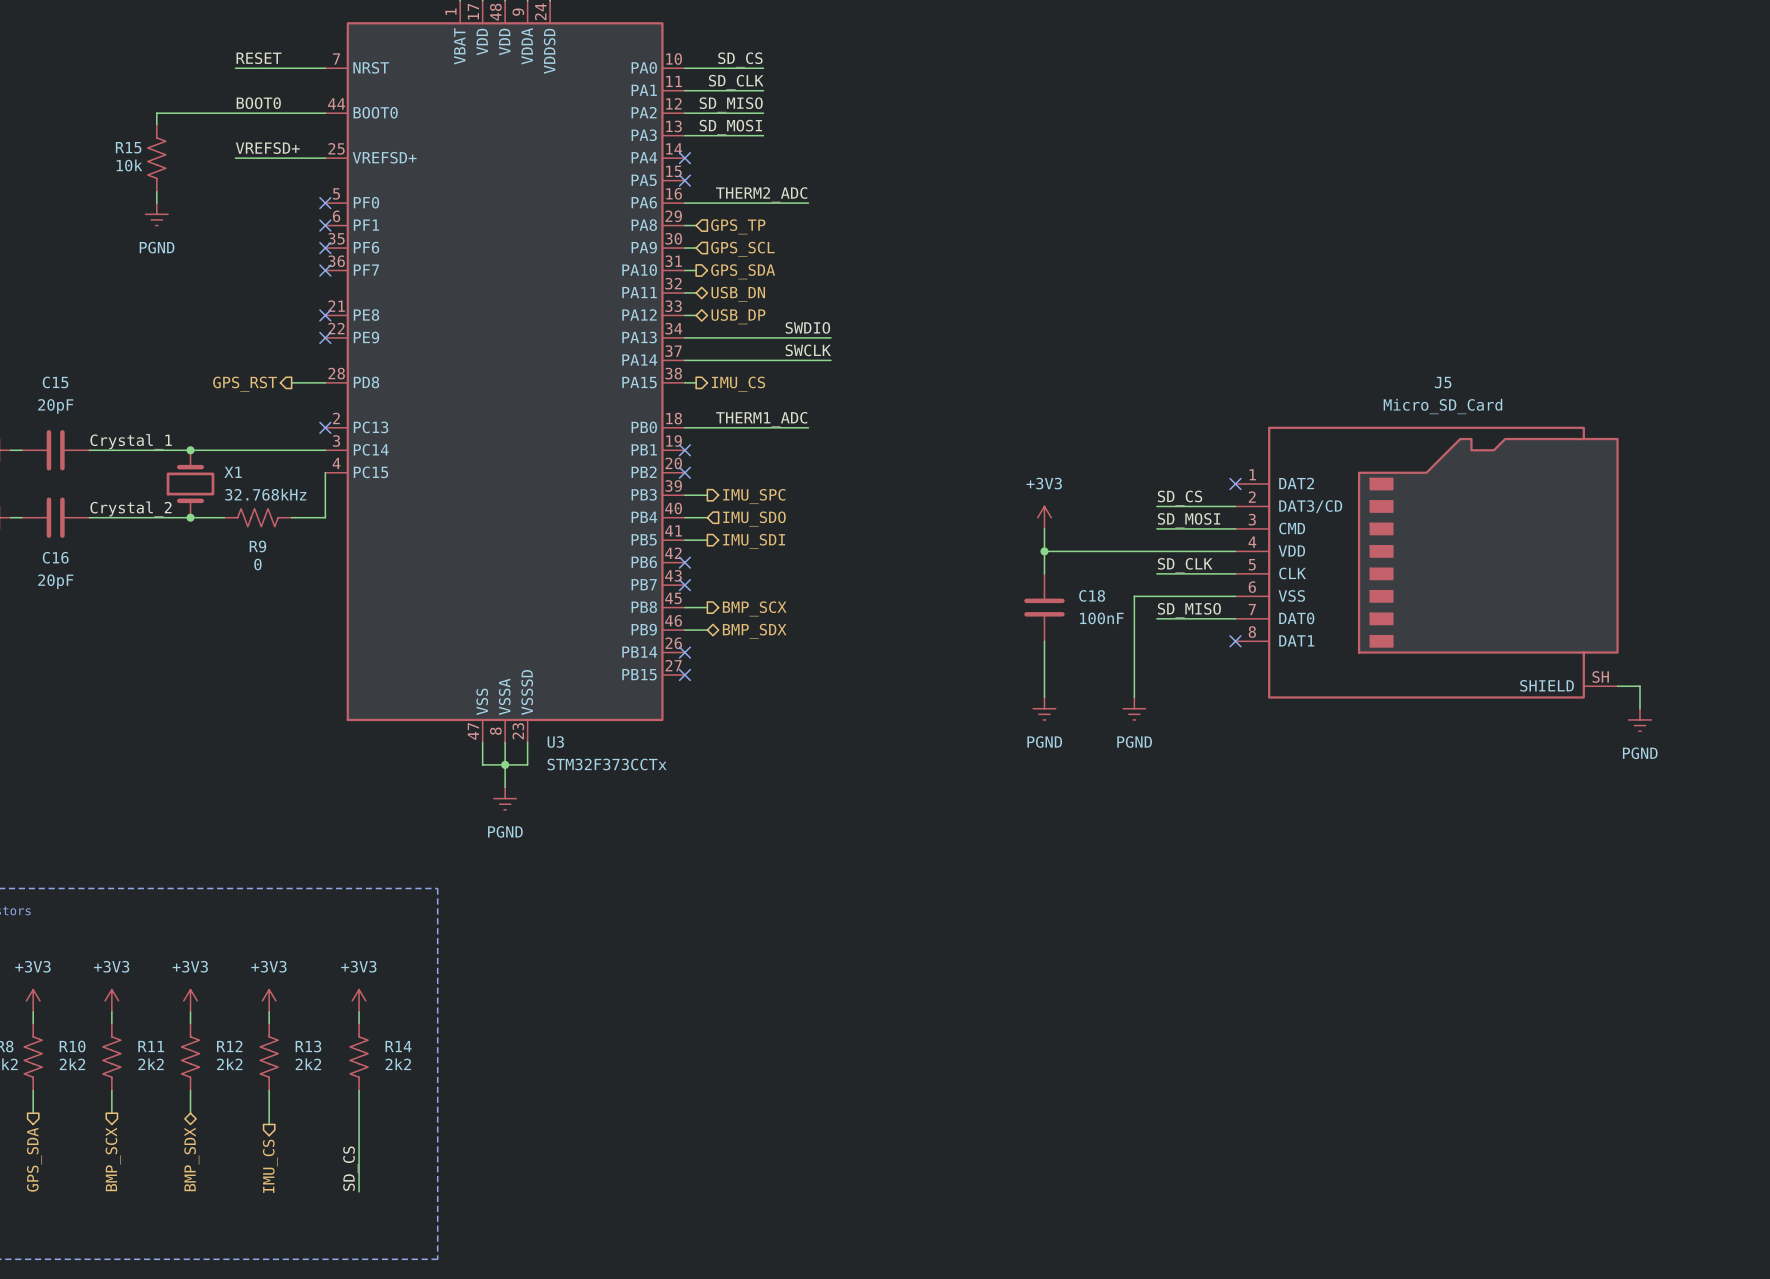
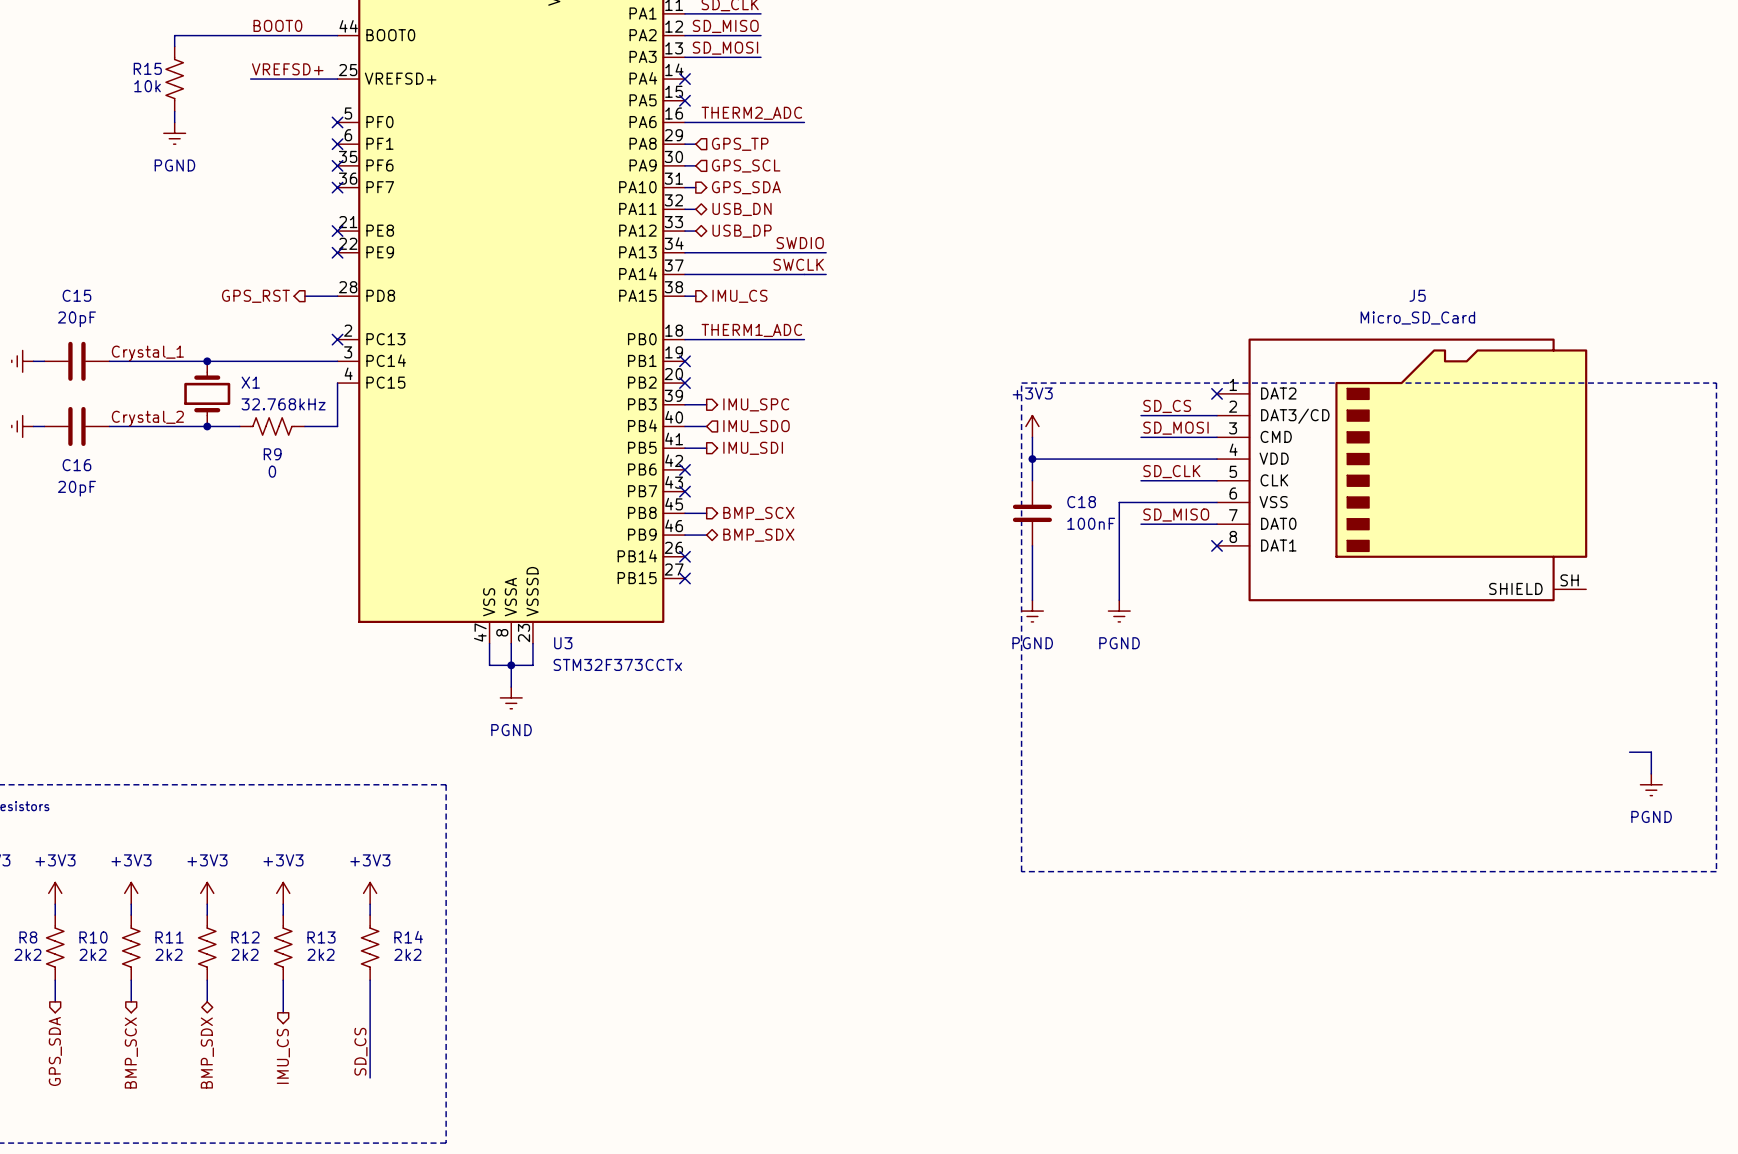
line: none -> (1021, 383) (1716, 383) (1716, 871) (1021, 871) (1021, 383)
wire: (1617, 686) (1639, 686) (1639, 708) -> (1629, 752) (1651, 752) (1651, 773)
power symbol position: PGND (1639, 719) -> PGND (1651, 784)

